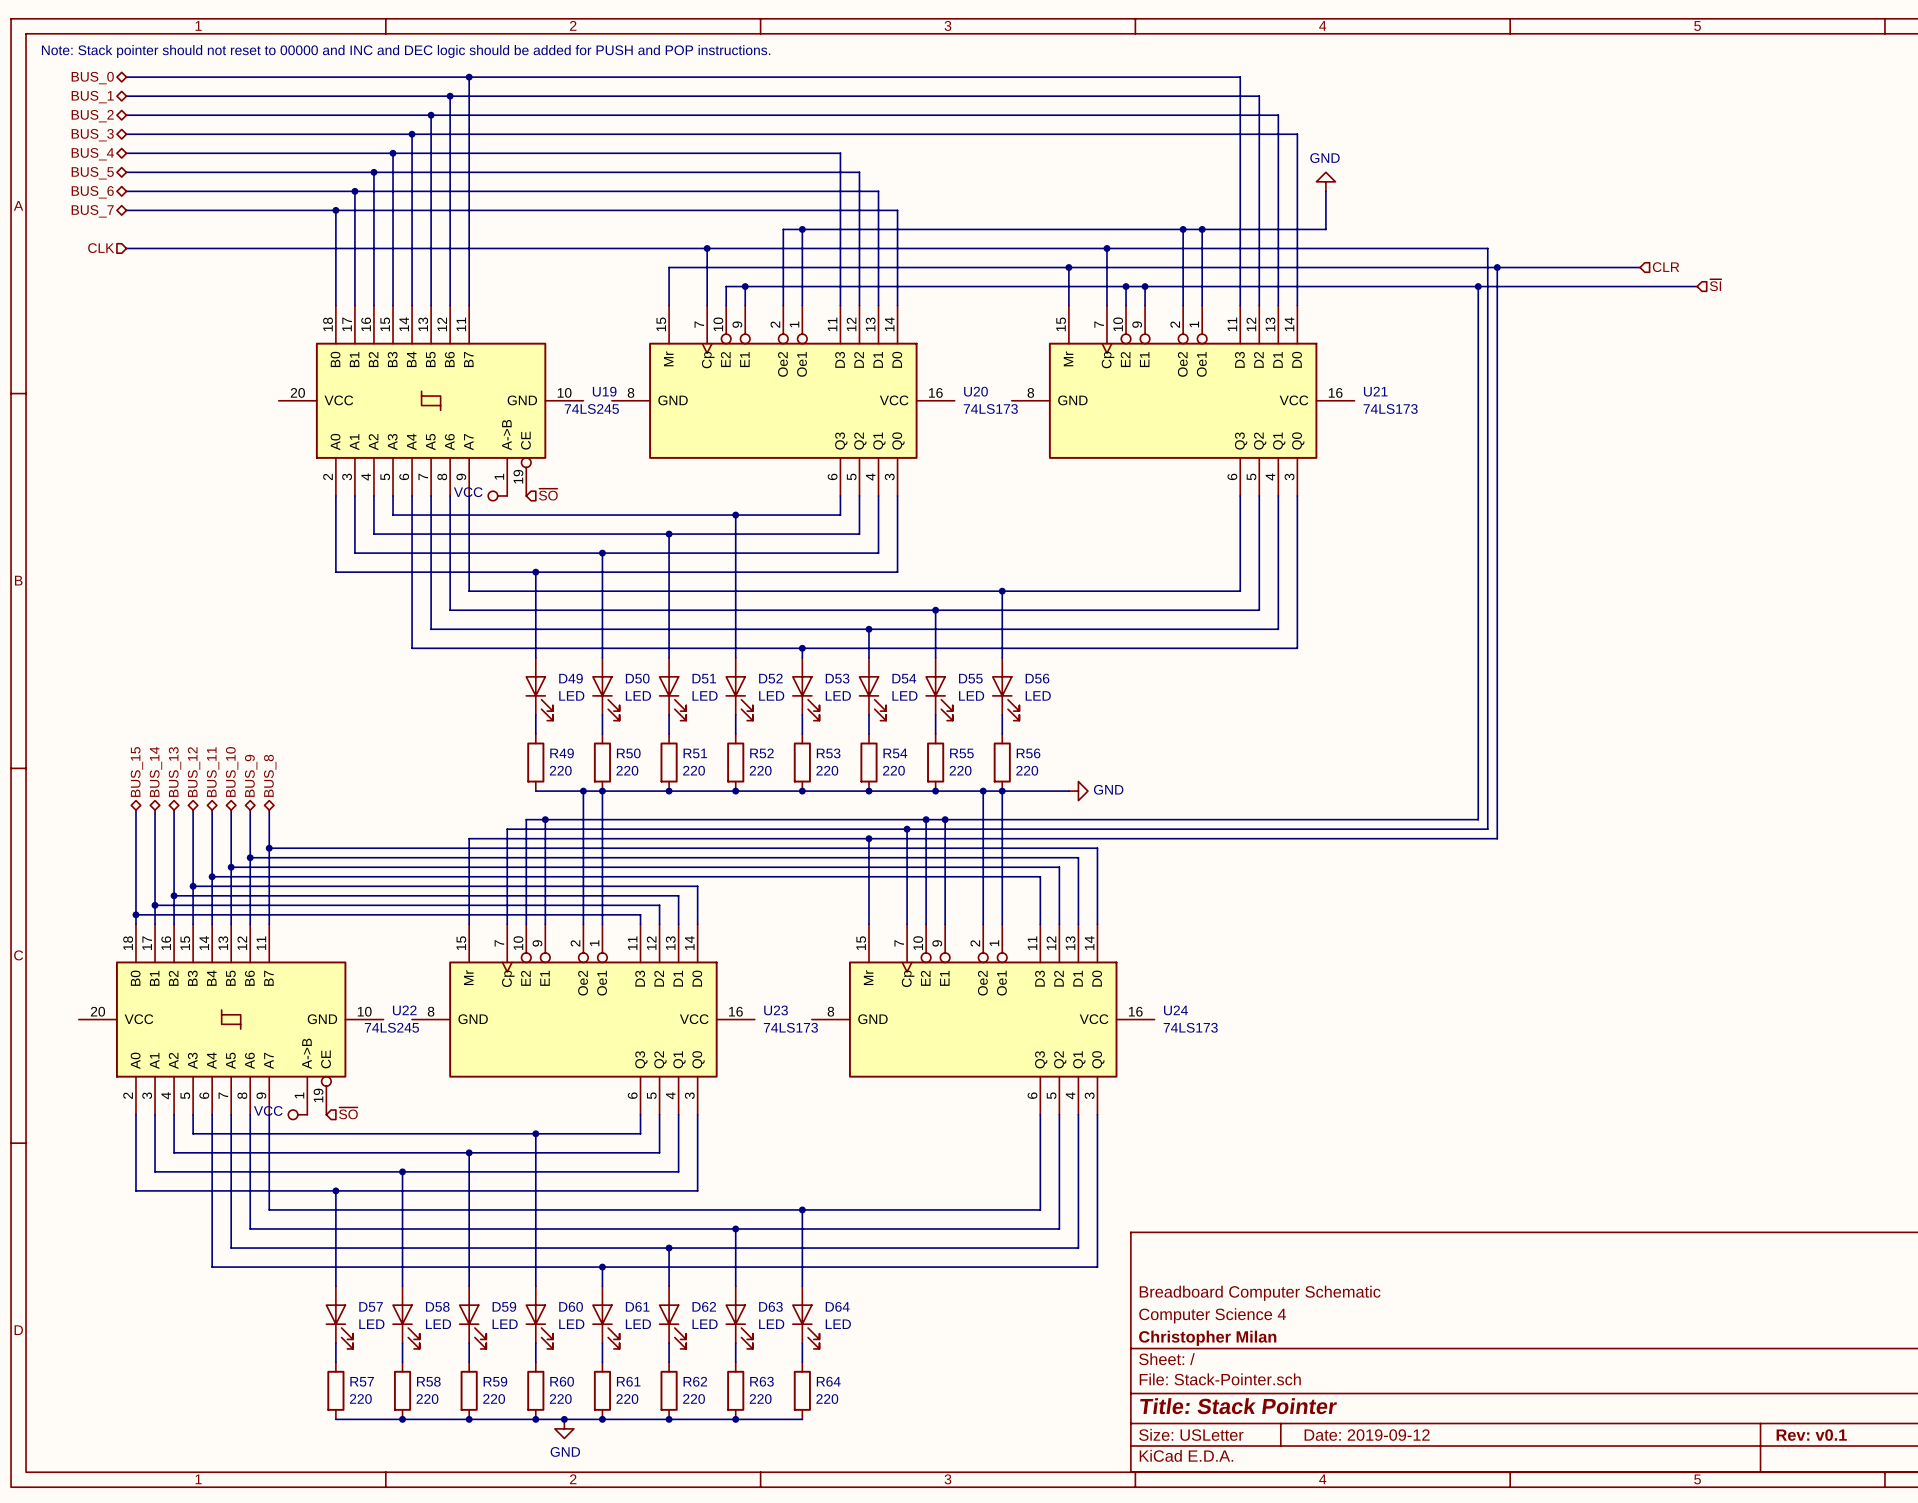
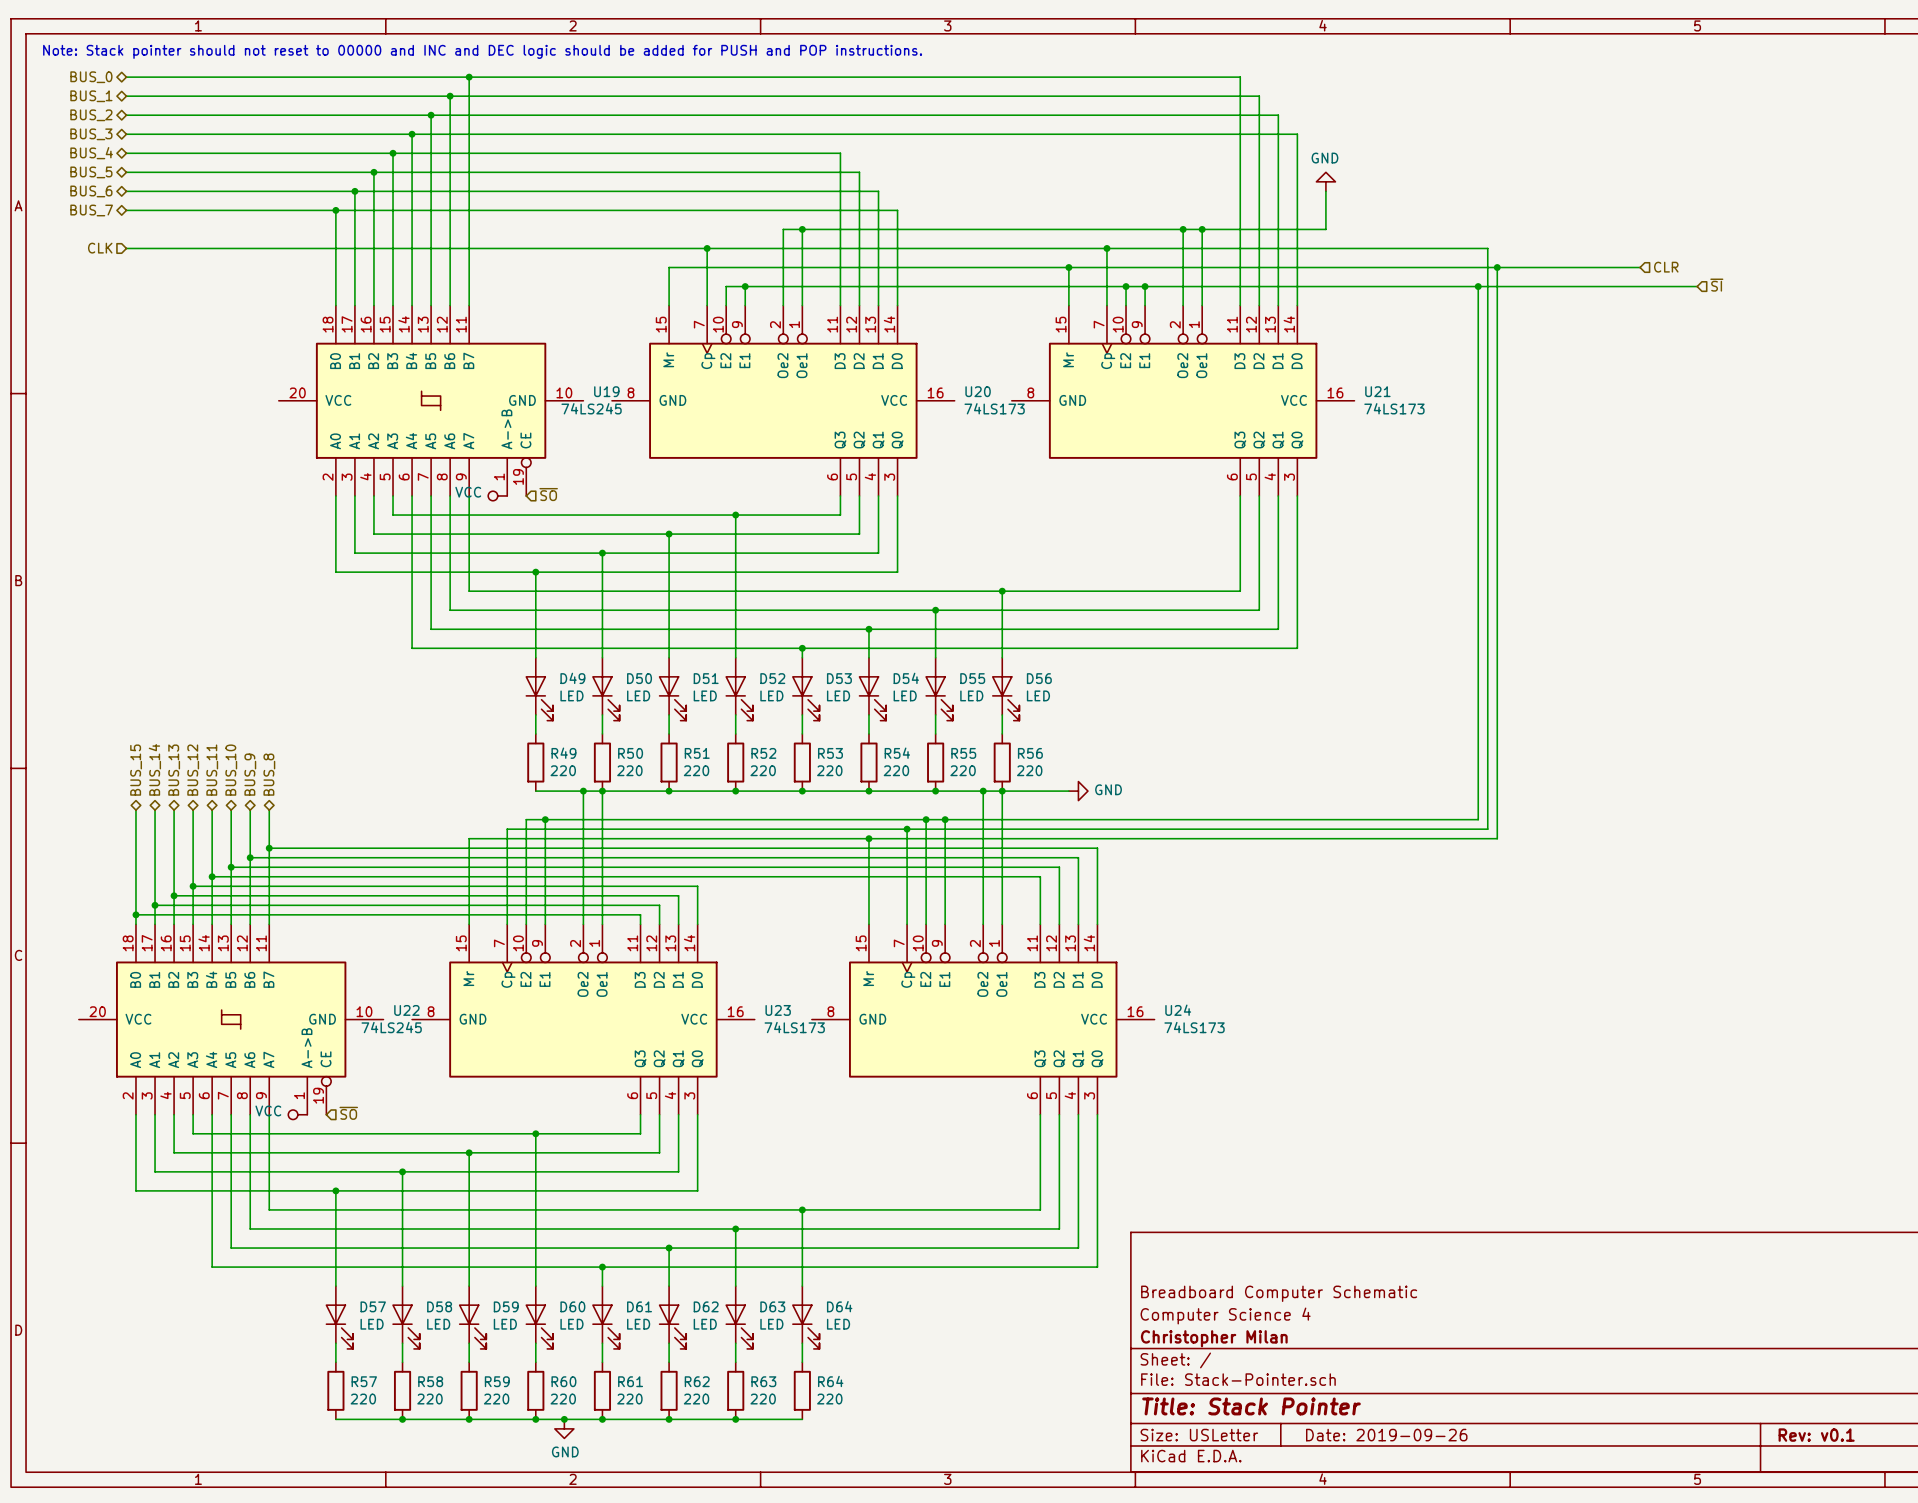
title block: Date: 2019-09-12 (1367, 1435) -> Date: 2019-09-26 (1386, 1435)

